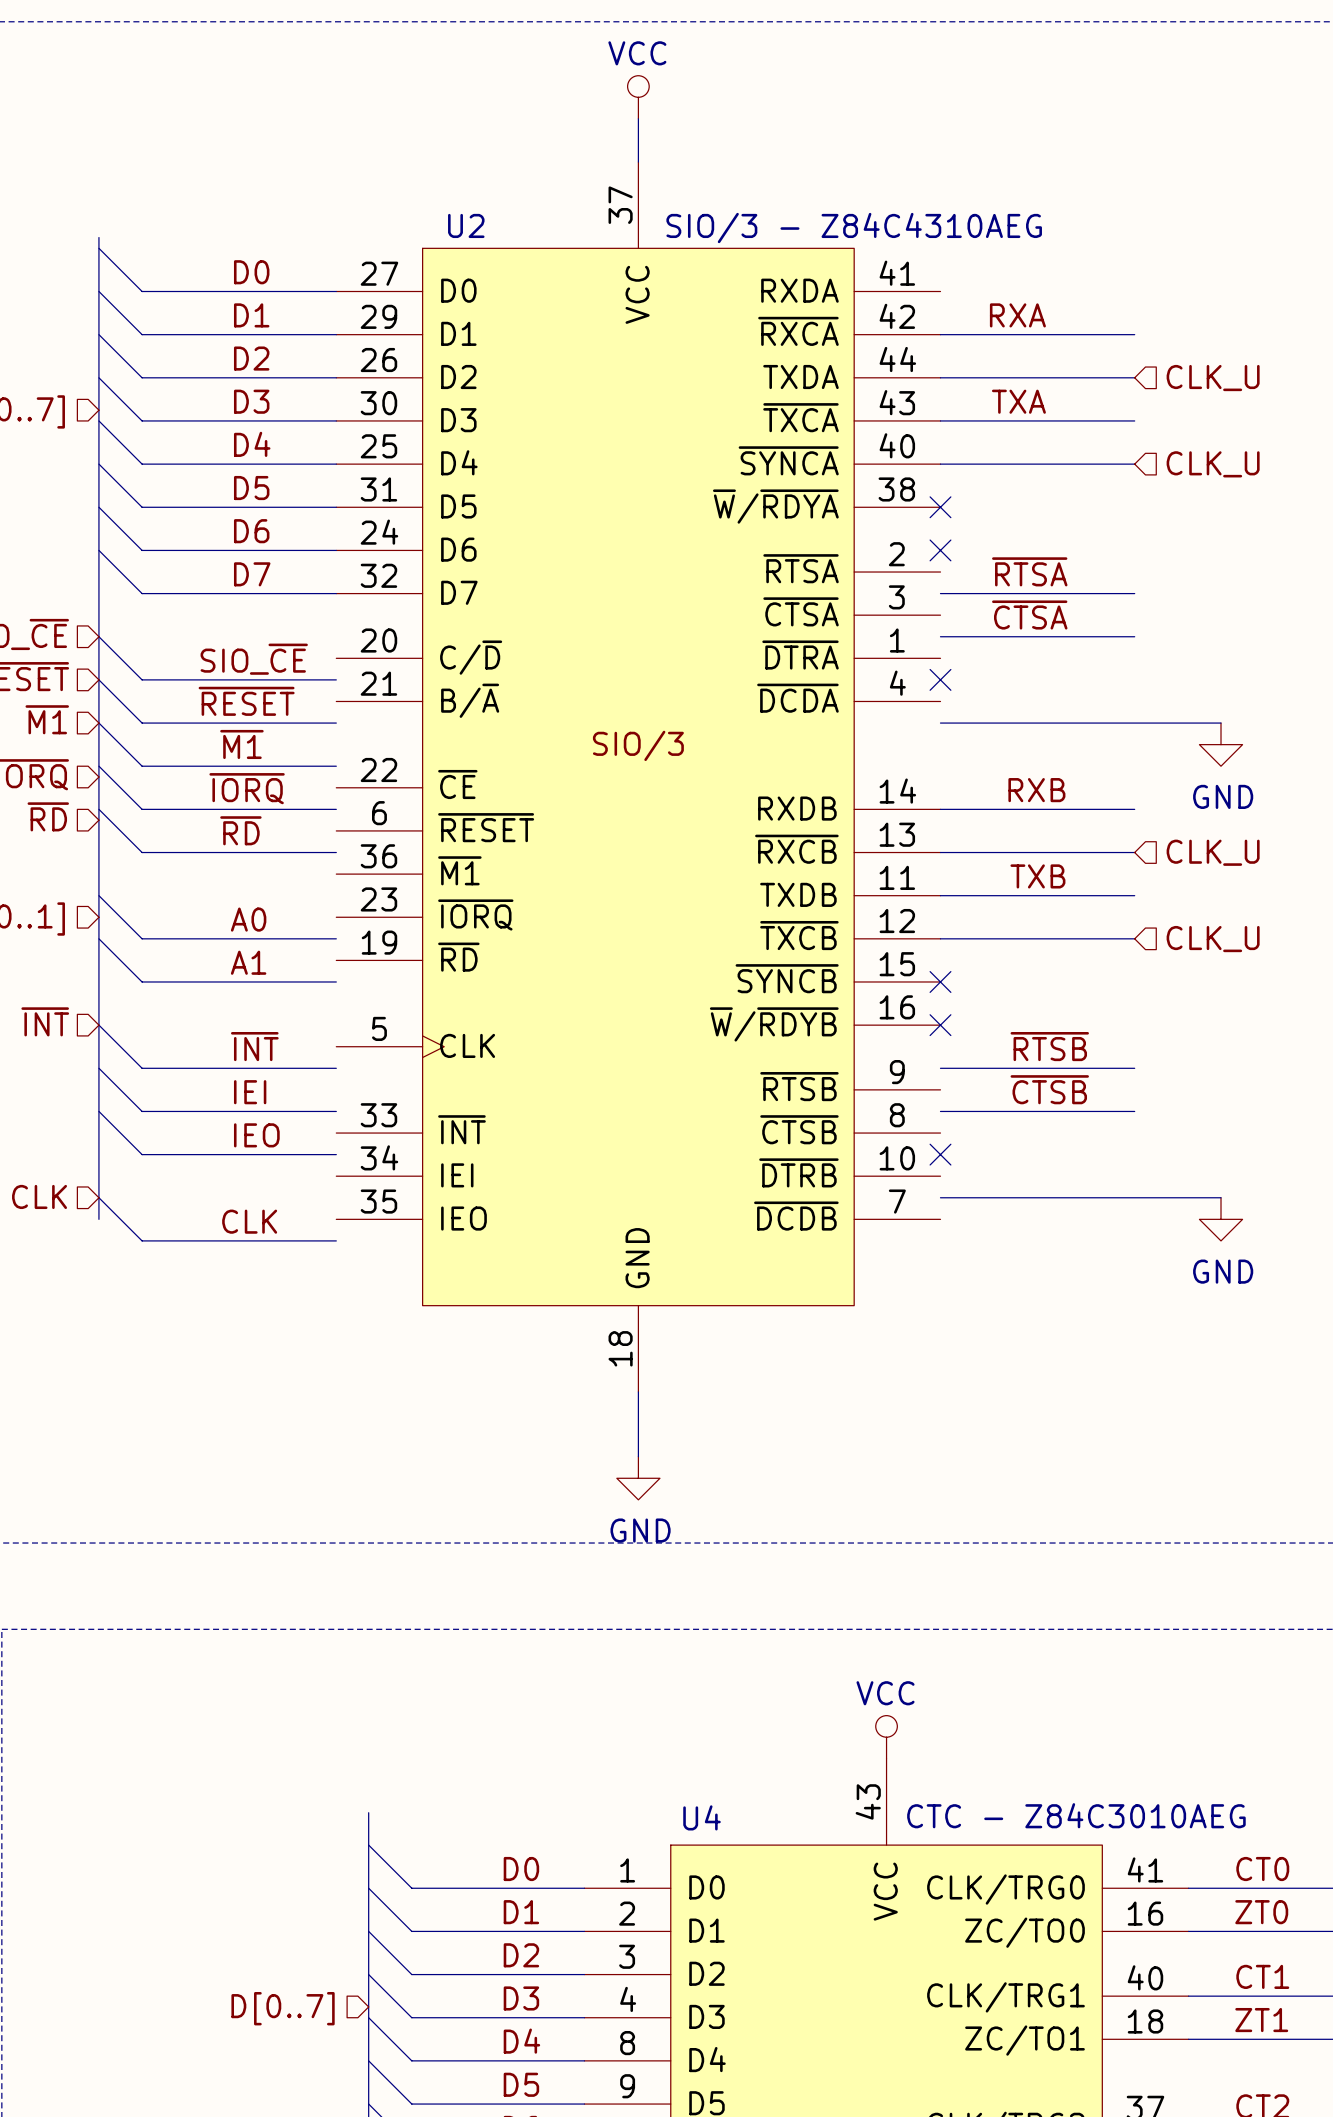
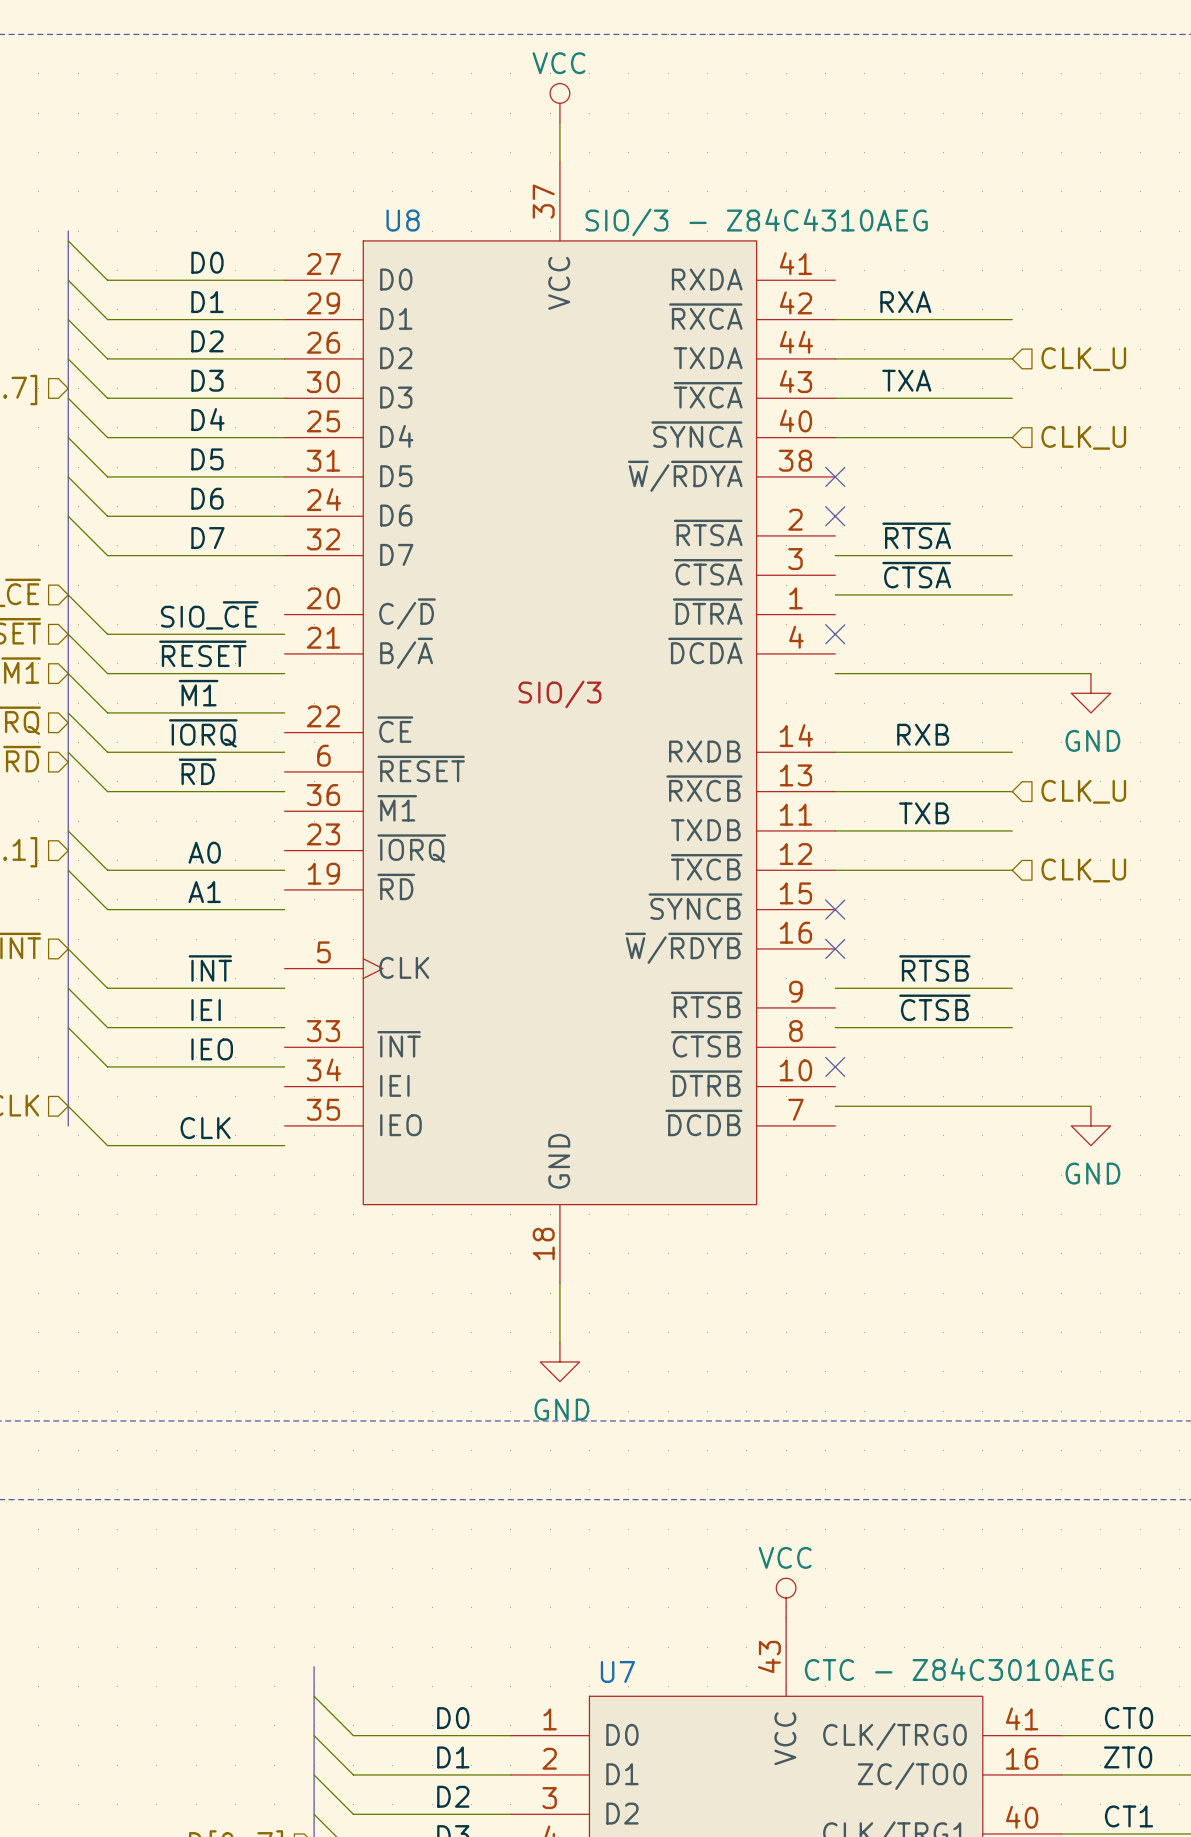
U2 name: U2 (466, 225) -> U8 (403, 220)
U4 name: U4 (702, 1817) -> U7 (617, 1671)

